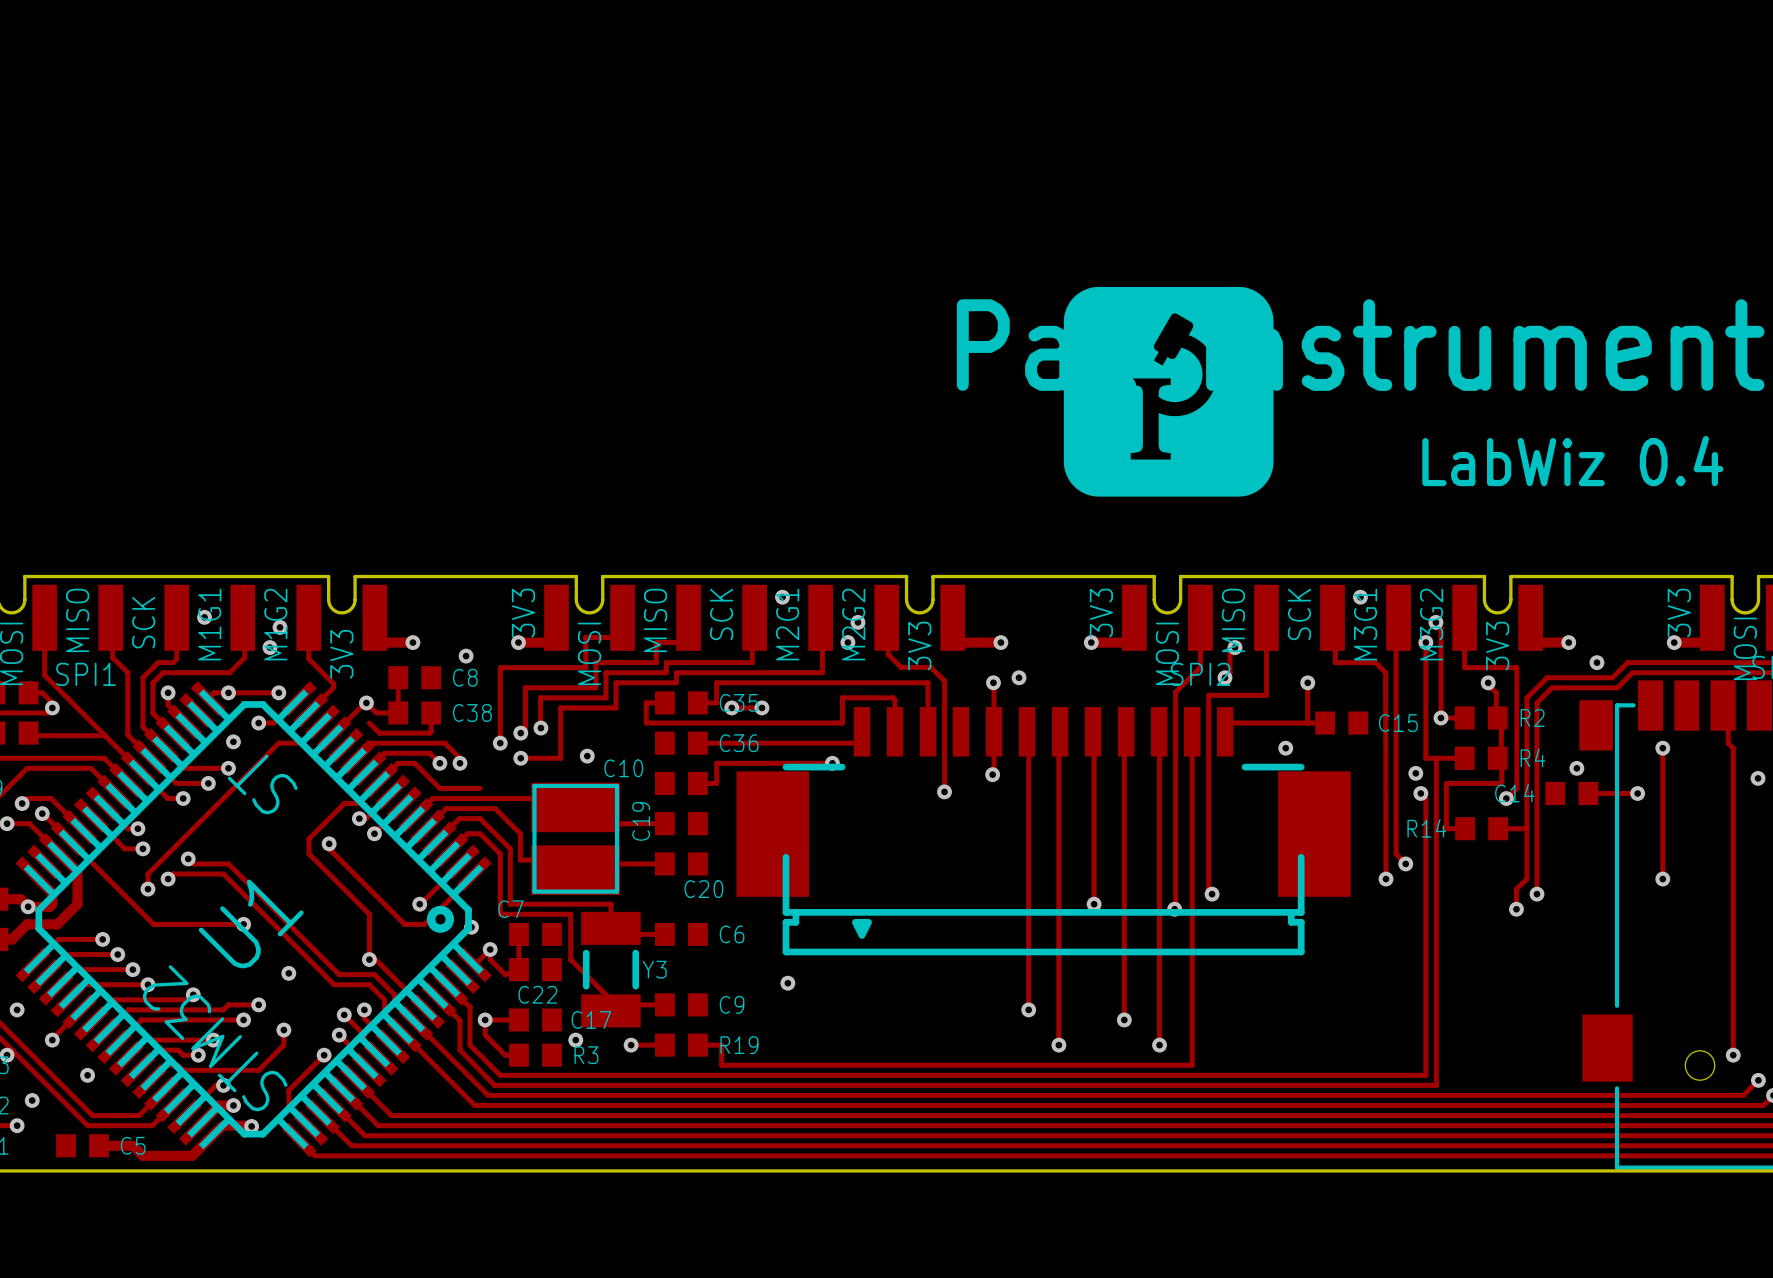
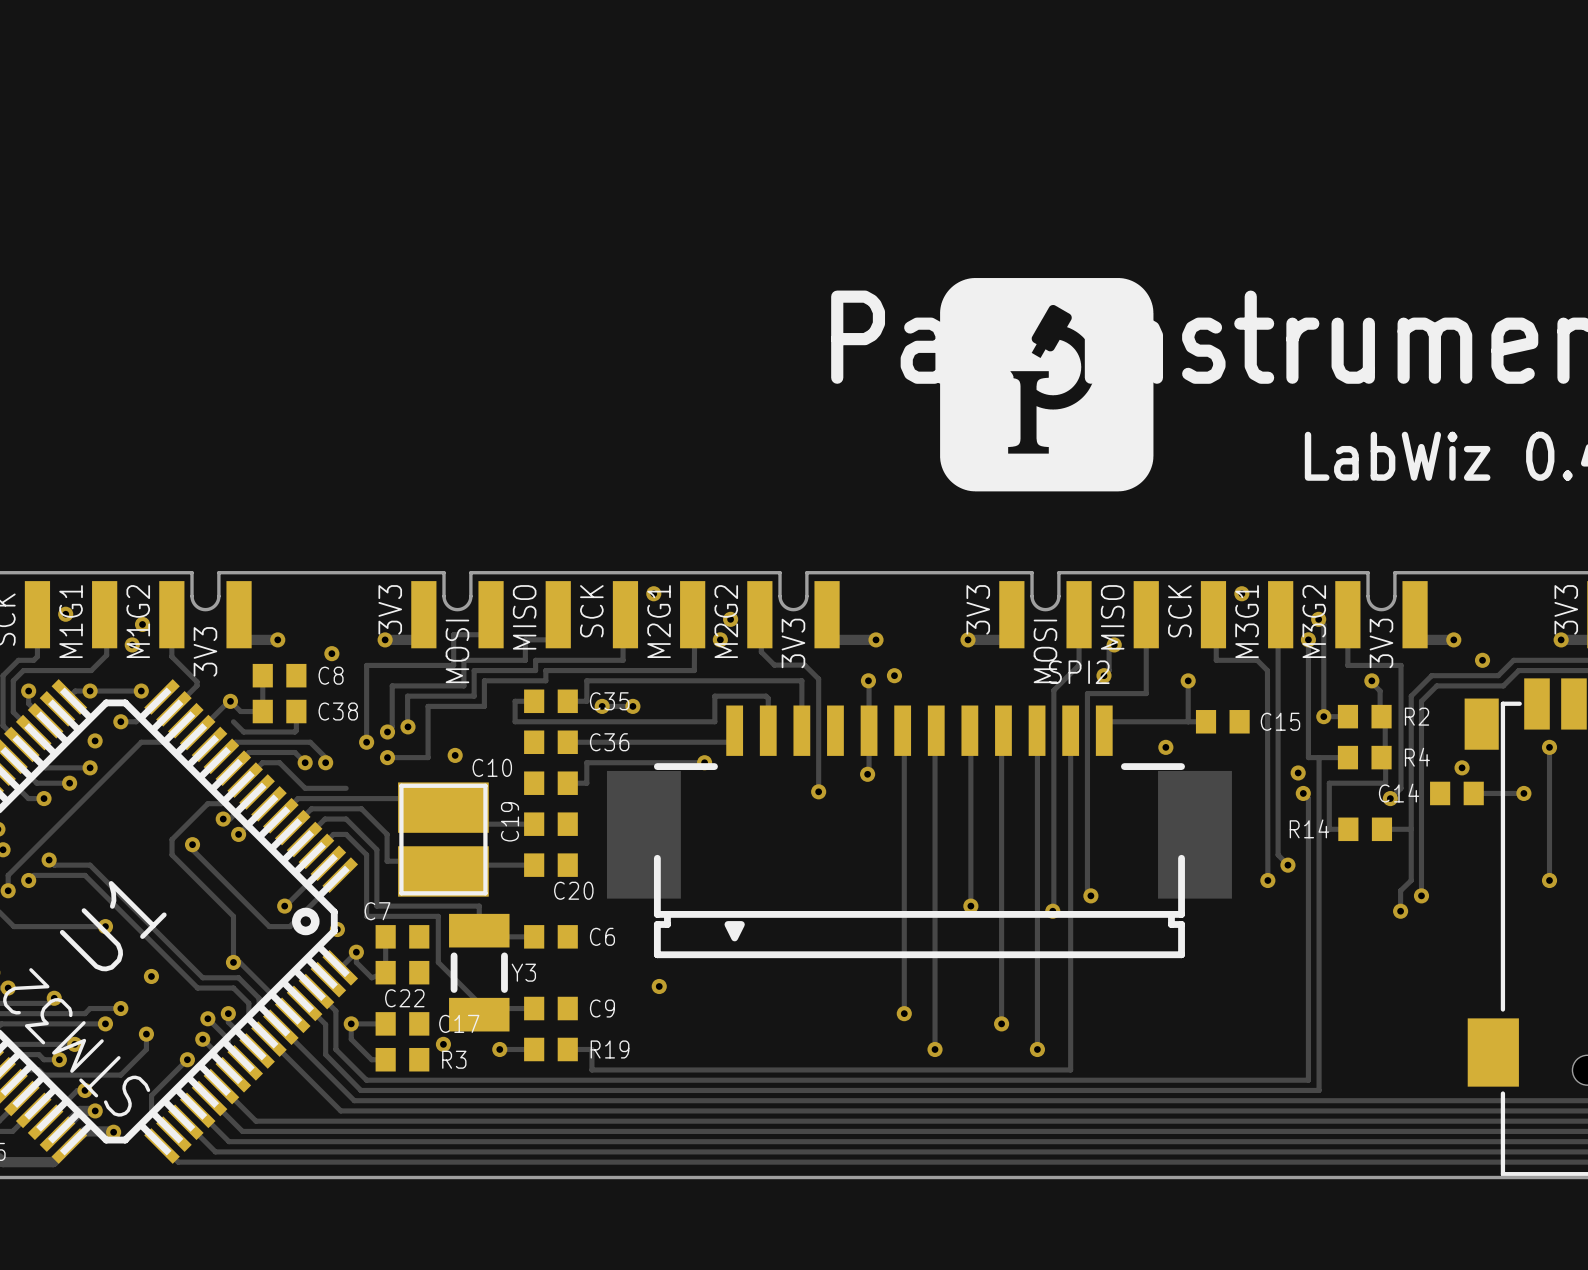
text: ST (262, 784) -> none

